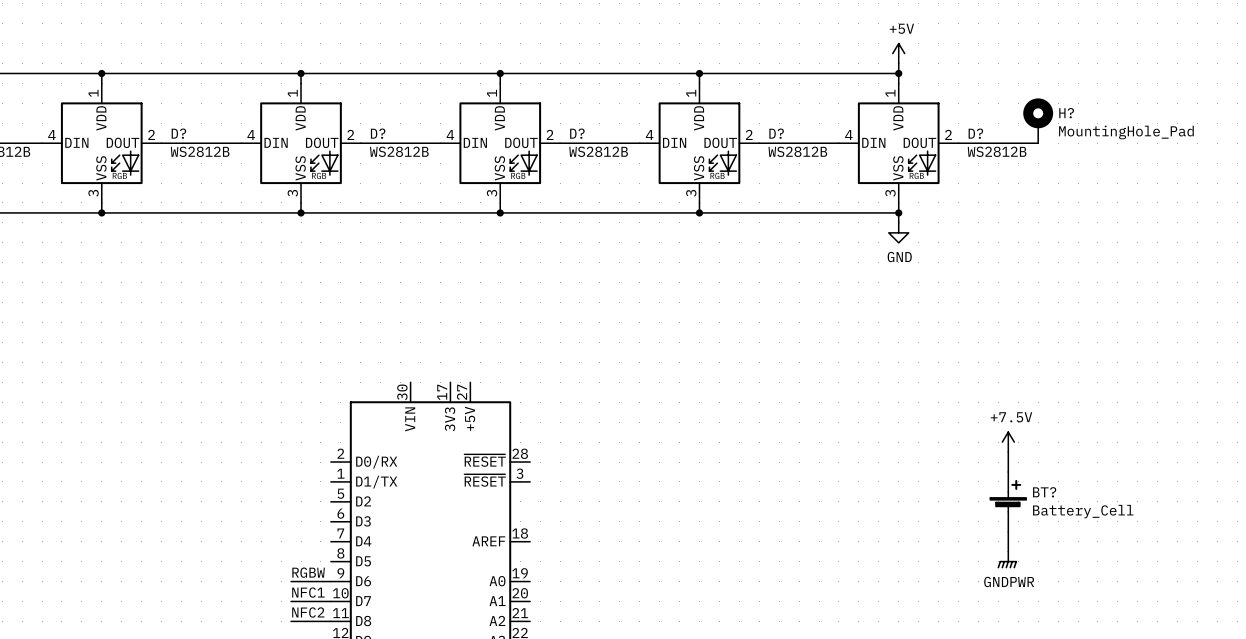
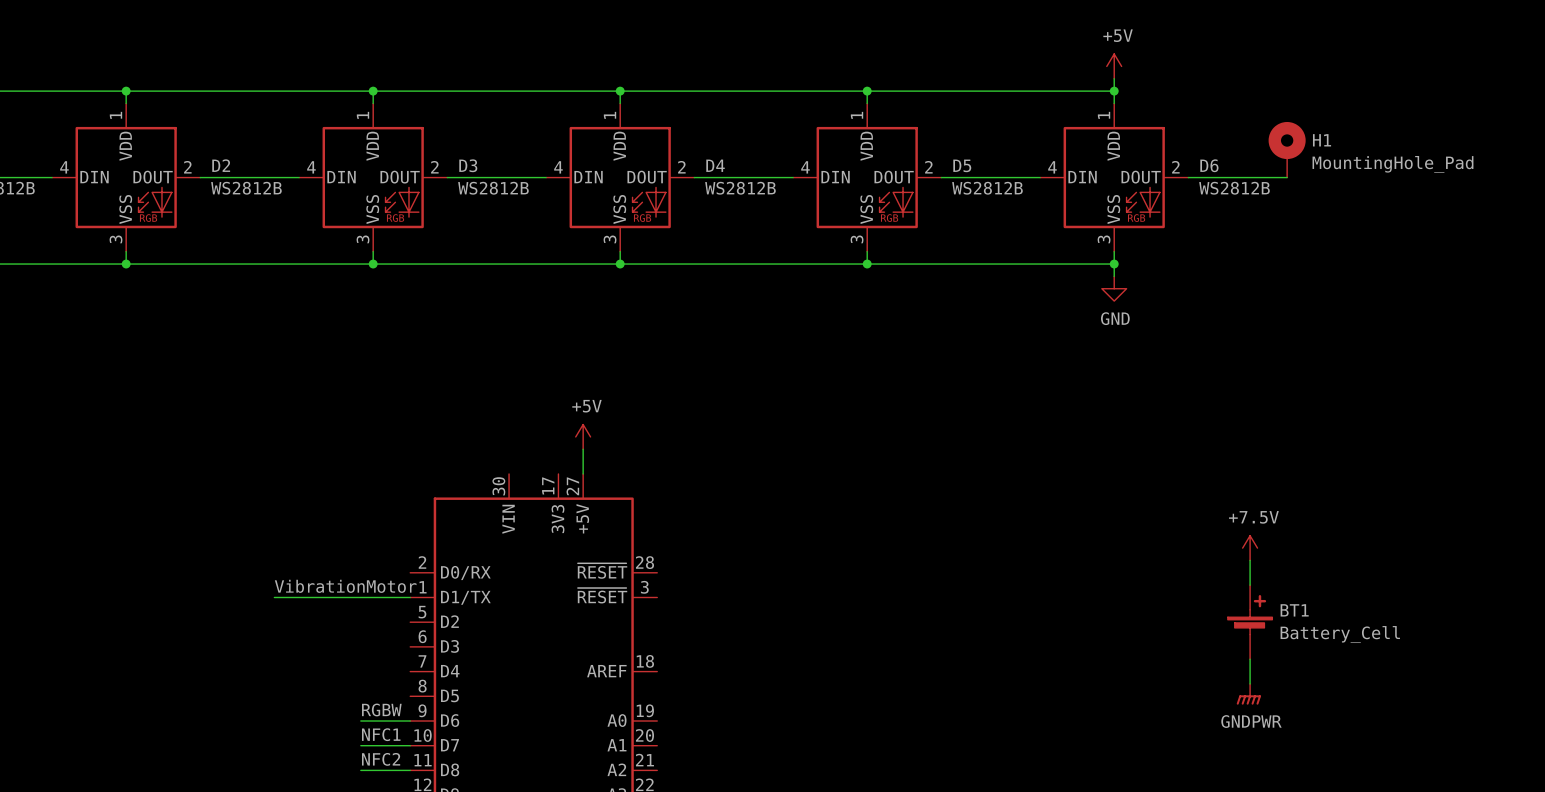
H? name: H? (1066, 113) -> H1 (1322, 140)
D? name: D? (178, 133) -> D2 (221, 165)
D? name: D? (378, 133) -> D3 (468, 165)
D? name: D? (577, 133) -> D4 (715, 165)
D? name: D? (776, 133) -> D5 (962, 165)
D? name: D? (975, 133) -> D6 (1209, 165)
power symbol: none -> +5V (583, 436)
wire: none -> (583, 449) (583, 473)
label: none -> VibrationMotor (345, 586)
wire: none -> (274, 597) (410, 597)
BT? name: BT? (1044, 492) -> BT1 (1294, 610)

